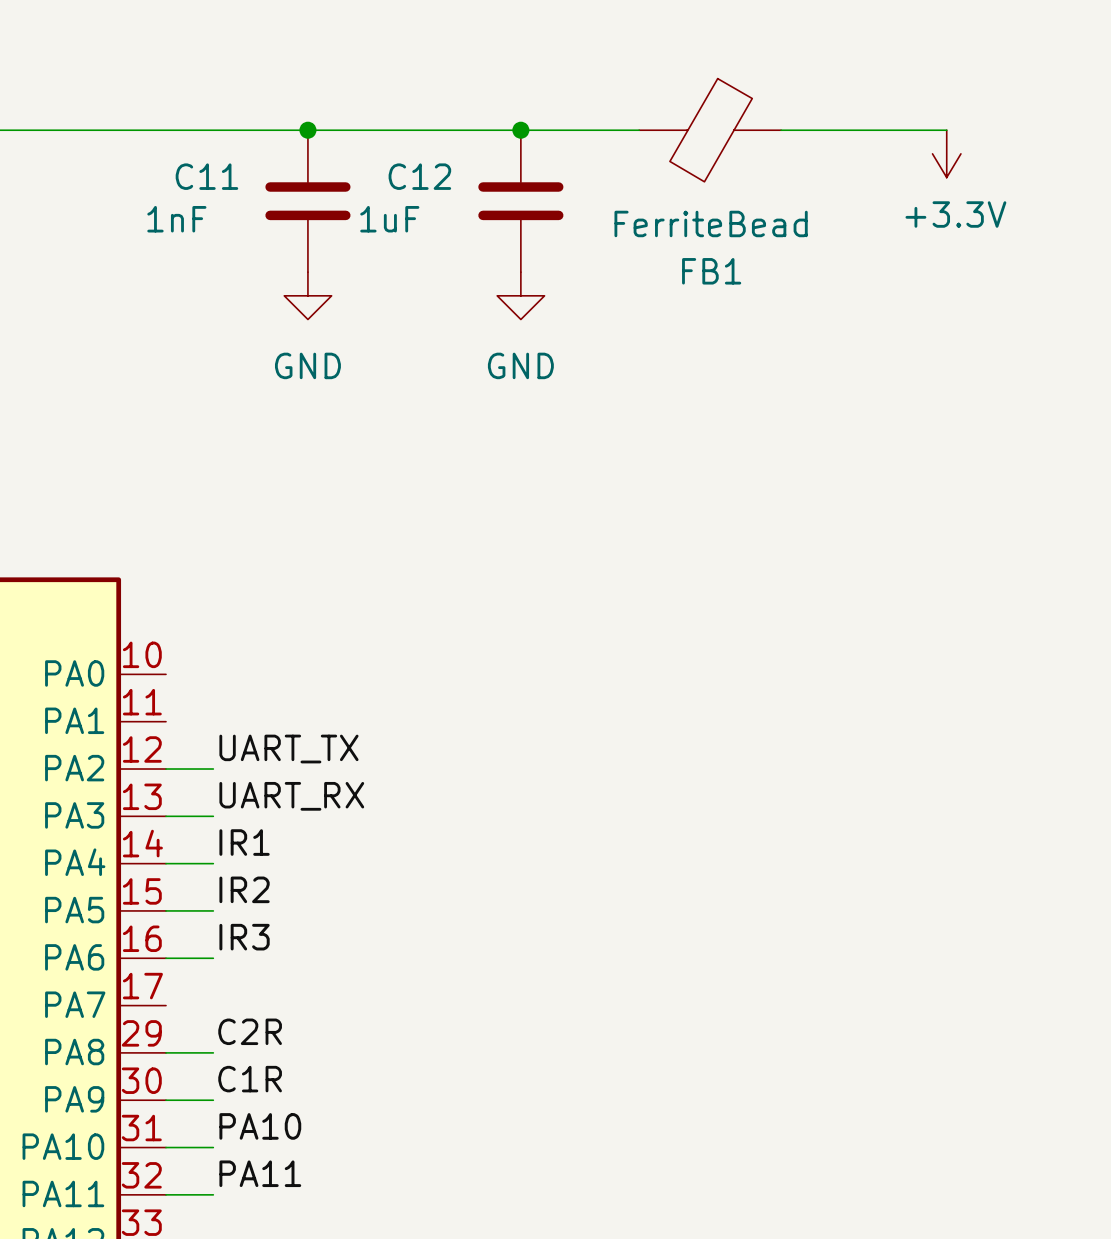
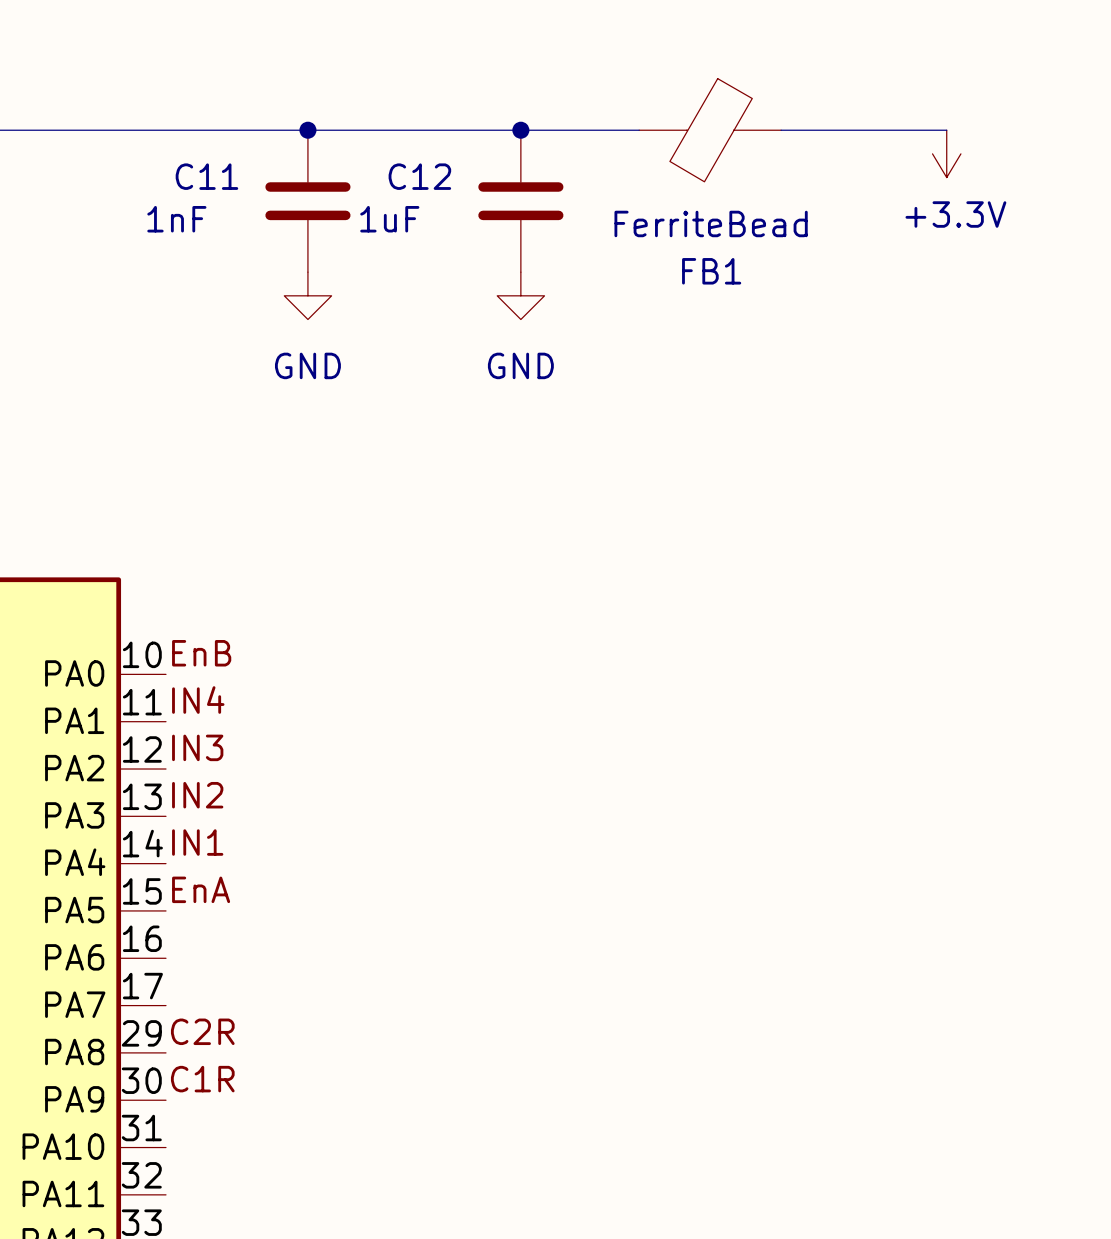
label: none -> EnB (201, 653)
label: none -> IN4 (198, 700)
label: none -> IN3 (197, 747)
label: UART_TX (288, 749) -> none
wire: (165, 769) (213, 769) -> none
label: none -> IN2 (197, 795)
label: UART_RX (291, 796) -> none
wire: (165, 816) (213, 816) -> none
label: IR1 (244, 842) -> IN1 (197, 842)
wire: (165, 863) (213, 863) -> none
label: none -> EnA (201, 889)
label: IR2 (244, 889) -> none
wire: (165, 910) (213, 910) -> none
label: IR3 (244, 937) -> none
wire: (165, 958) (213, 958) -> none
label position: C2R (250, 1031) -> C2R (202, 1031)
wire: (165, 1052) (213, 1052) -> none
label position: C1R (250, 1079) -> C1R (202, 1079)
wire: (165, 1100) (213, 1100) -> none
label: PA10 (260, 1126) -> none
wire: (165, 1147) (213, 1147) -> none
label: PA11 (260, 1173) -> none
wire: (165, 1194) (213, 1194) -> none

